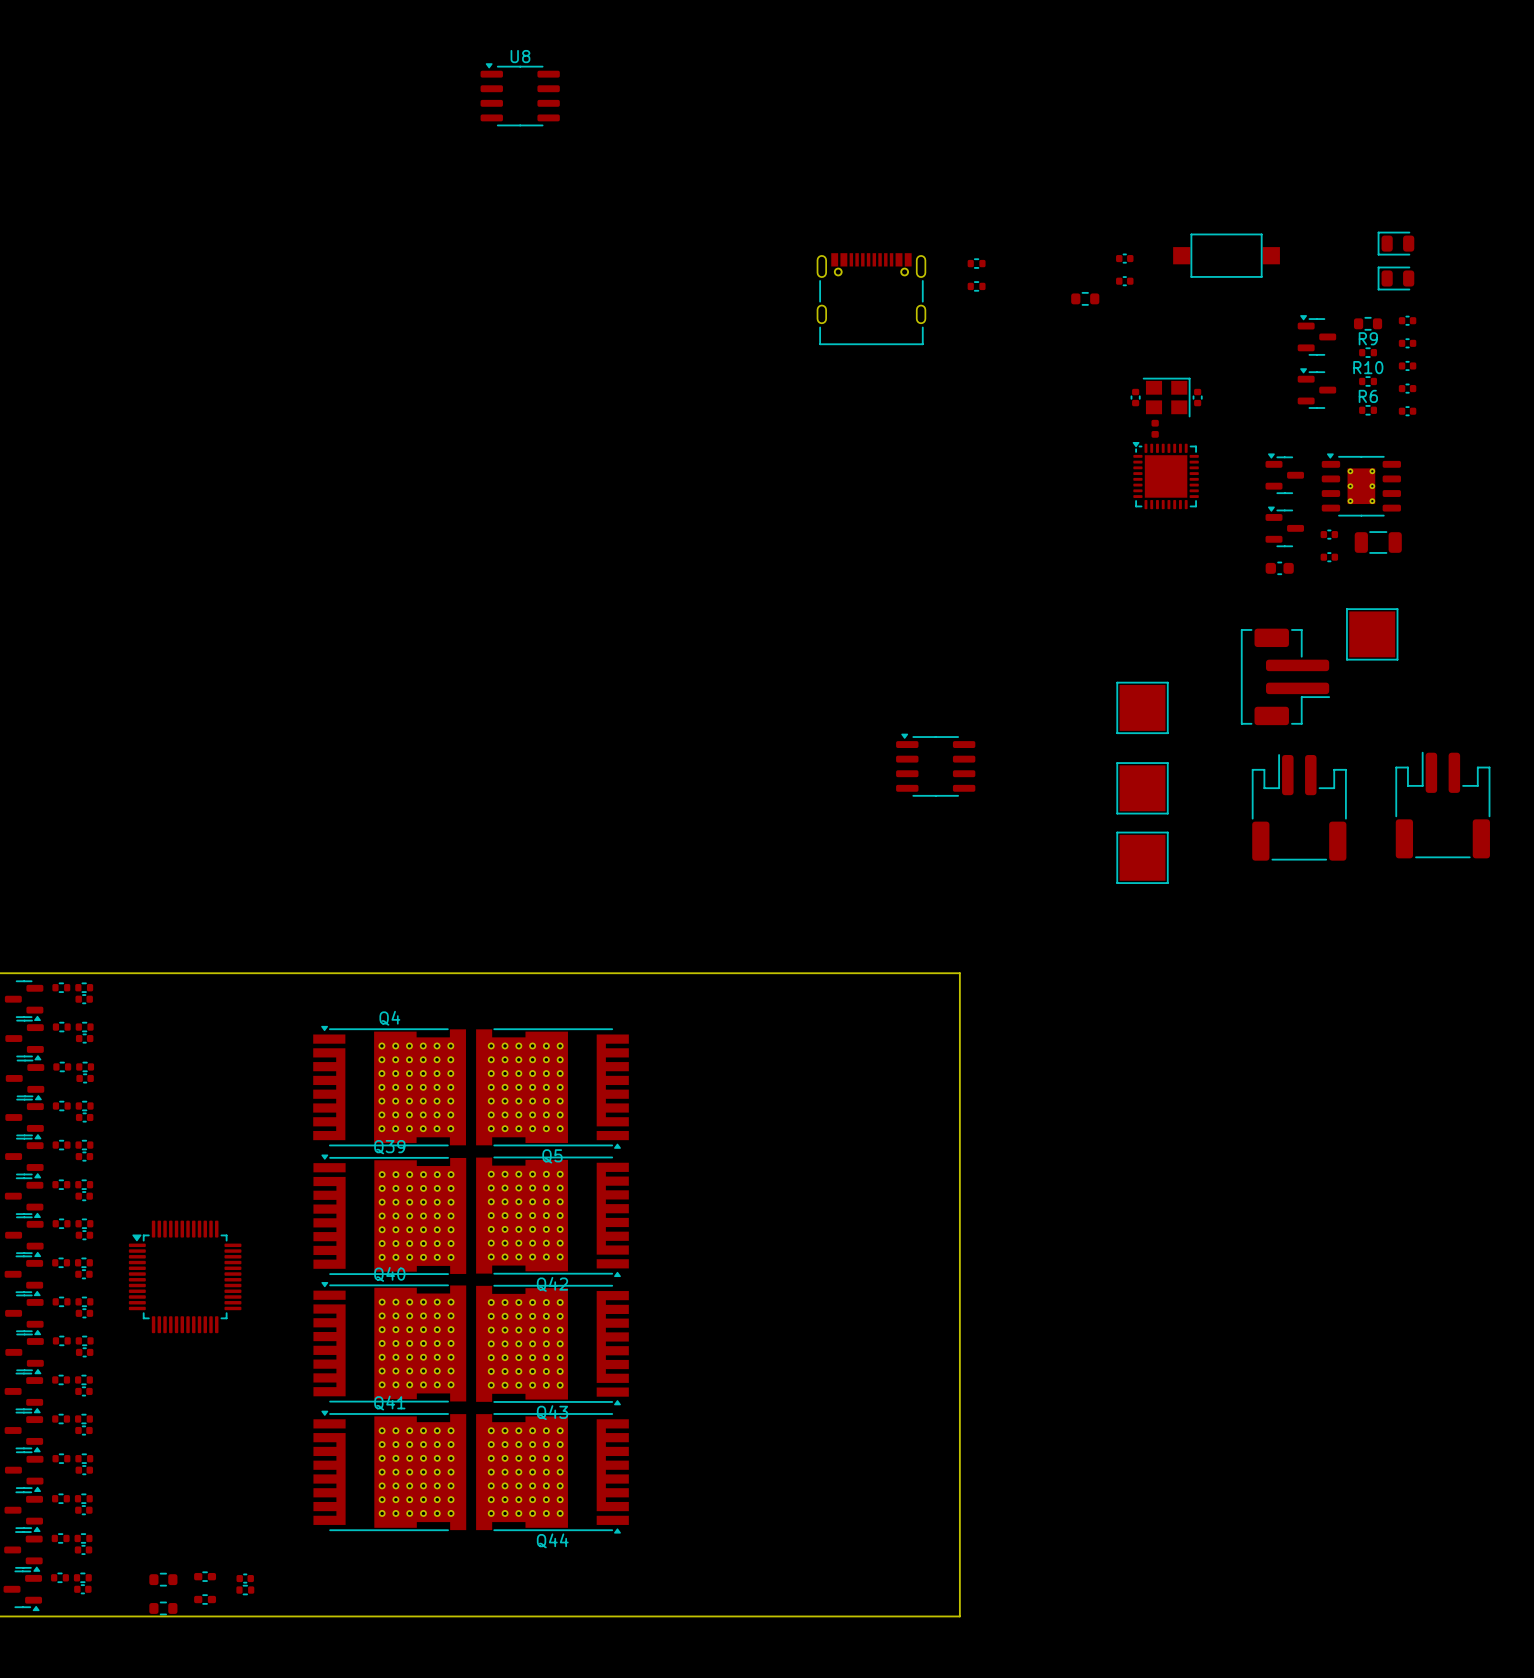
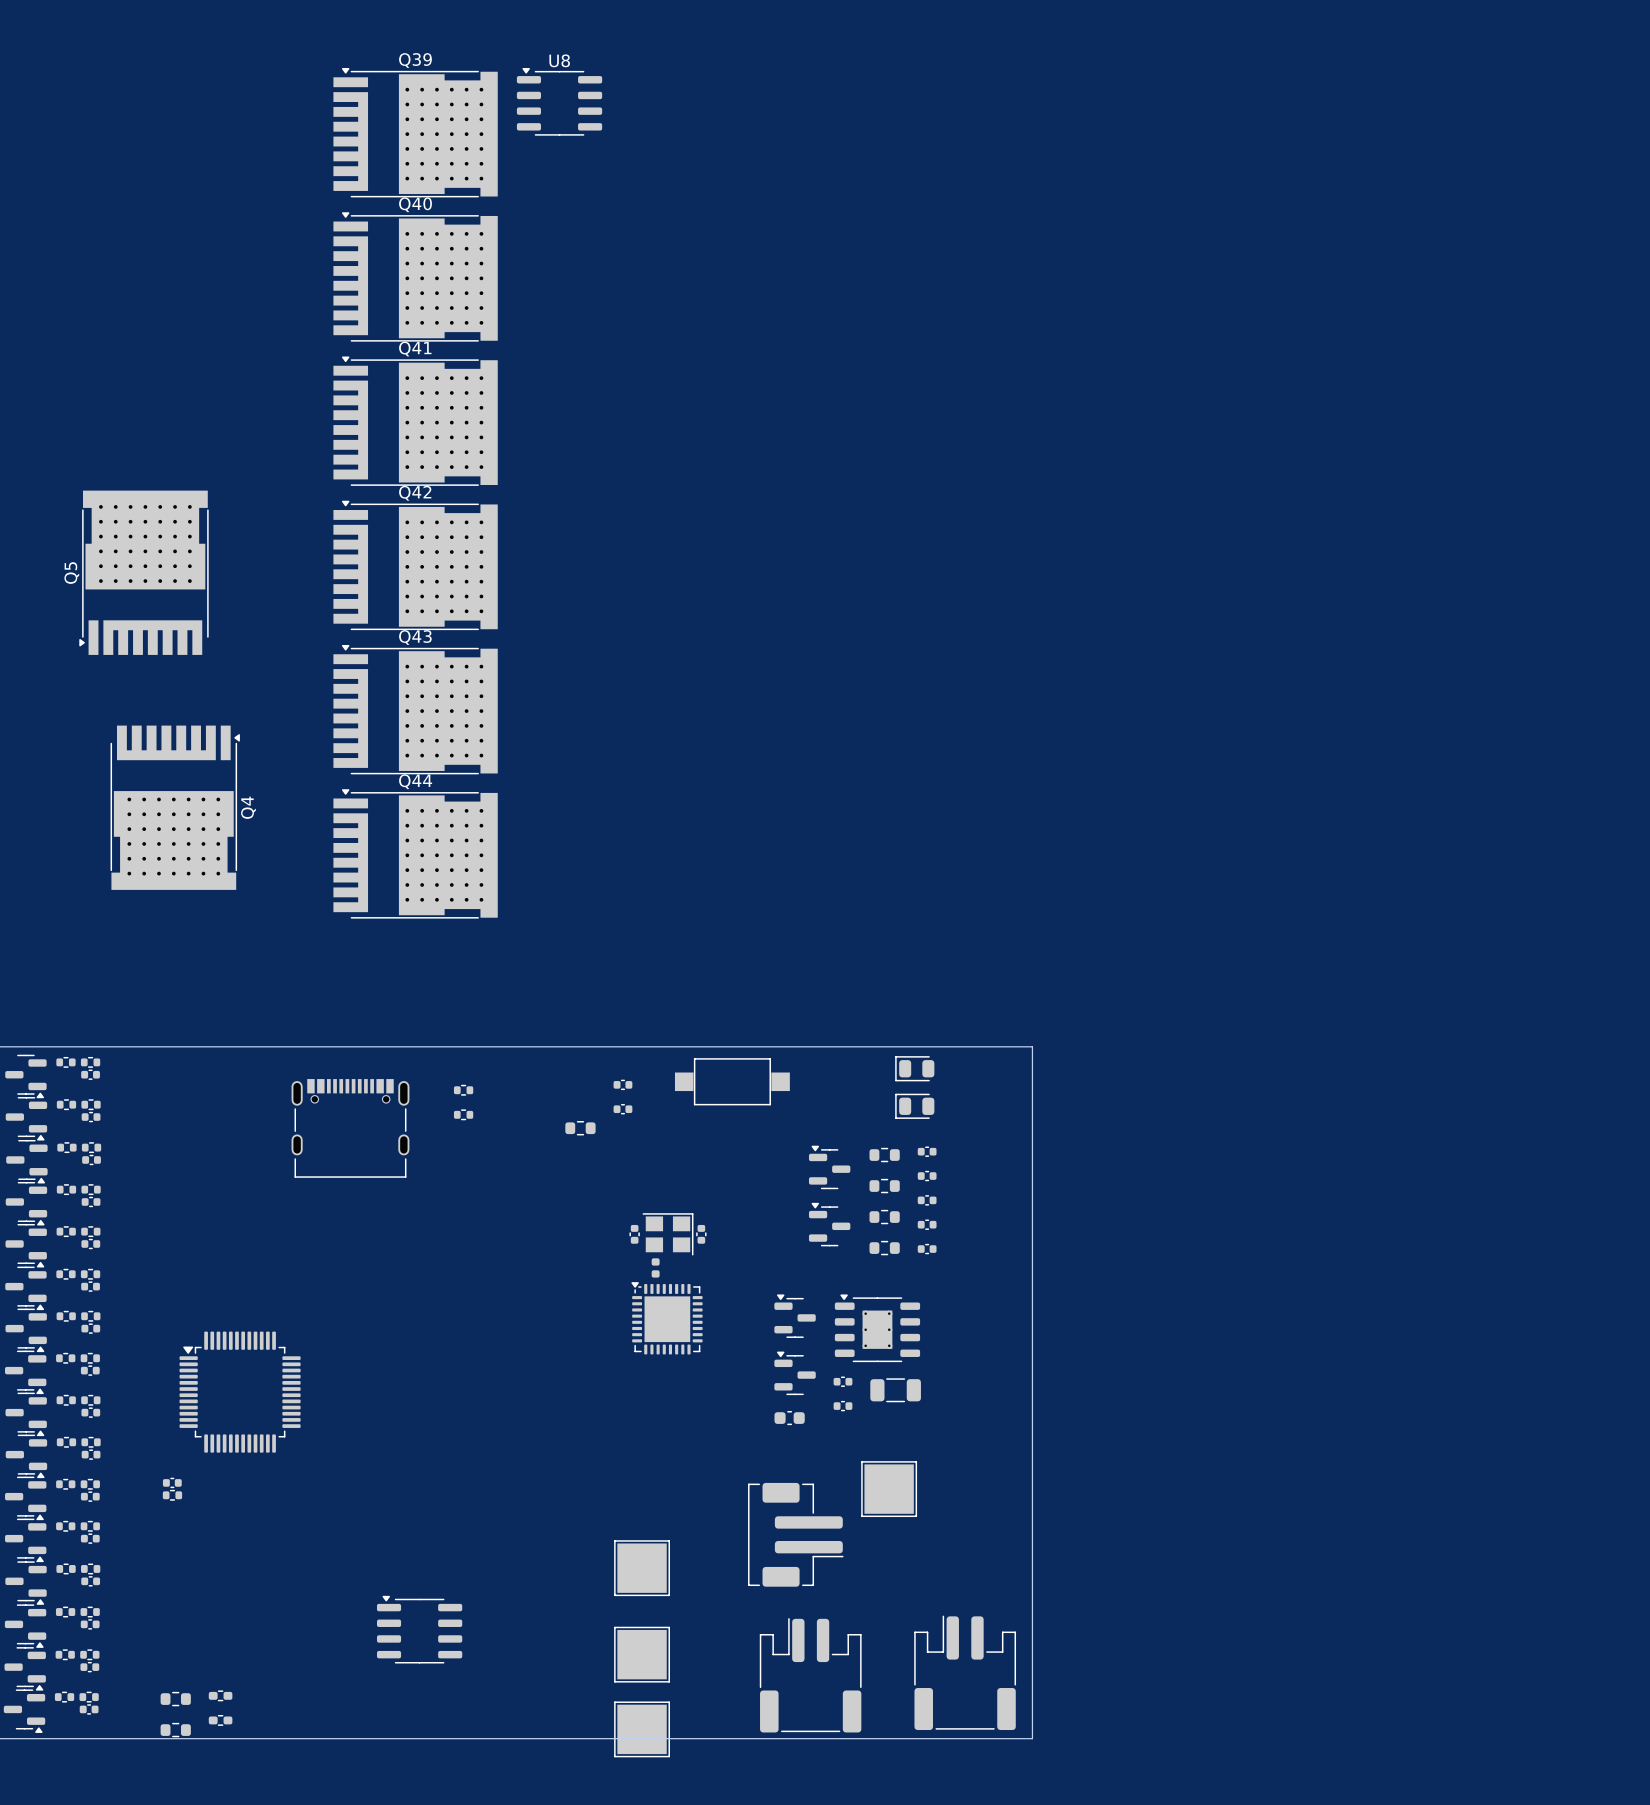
part: (1396, 243) -> none
part: (1226, 255) -> none
part: (1124, 258) -> none
part: (976, 263) -> none
part: (1396, 278) -> none
part: (1124, 281) -> none
part: (976, 286) -> none
part: (1085, 298) -> none
part: (871, 299) -> none
part: (1407, 320) -> none
part: (1368, 323) -> none
part: (1316, 335) -> none
part: (1407, 343) -> none
R9: (1368, 352) -> none
part: (1407, 365) -> none
R10: (1368, 381) -> none
part: (1316, 388) -> none
part: (1407, 388) -> none
part: (1135, 397) -> none
part: (1166, 397) -> none
part: (1197, 397) -> none
R6: (1368, 410) -> none
part: (1407, 411) -> none
part: (1155, 428) -> none
part: (1284, 473) -> none
part: (1165, 475) -> none
part: (1361, 484) -> none
part: (1284, 526) -> none
part: (1329, 534) -> none
part: (1378, 542) -> none
part: (1329, 557) -> none
part: (1279, 568) -> none
part: (1372, 634) -> none
part: (1285, 676) -> none
part: (1142, 707) -> none
part: (935, 765) -> none
part: (1142, 788) -> none
part: (1442, 805) -> none
part: (1299, 807) -> none
part: (1142, 857) -> none
part: none -> (914, 1068)
part: none -> (732, 1081)
part: none -> (622, 1084)
part: none -> (463, 1090)
part: none -> (914, 1106)
part: none -> (622, 1109)
part: none -> (463, 1114)
part: none -> (580, 1128)
part: none -> (350, 1128)
part: none -> (927, 1151)
part: none -> (884, 1155)
part: none -> (829, 1167)
Q4 rotation: 0° (389, 1086) -> 90° clockwise (175, 807)
Q4 position: (389, 1086) -> (175, 807)
Q5 rotation: 0° (552, 1088) -> 90° clockwise (143, 572)
Q5 position: (552, 1088) -> (143, 572)
part: none -> (927, 1176)
part: none -> (884, 1186)
part: none -> (927, 1200)
part: none -> (884, 1217)
part: none -> (829, 1224)
part: none -> (927, 1224)
part: none -> (634, 1234)
part: none -> (667, 1234)
part: none -> (701, 1234)
part: none -> (884, 1248)
part: none -> (927, 1249)
part: none -> (655, 1267)
Q39 position: (389, 1214) -> (415, 132)
Q42 rotation: 0° (552, 1216) -> 180° (415, 565)
Q42 position: (552, 1216) -> (415, 565)
part: none -> (795, 1316)
part: none -> (667, 1318)
part: none -> (877, 1328)
part position: (185, 1276) -> (240, 1392)
part: none -> (795, 1373)
part: none -> (842, 1381)
part: none -> (895, 1390)
part: none -> (842, 1406)
part: none -> (789, 1418)
Q40 position: (389, 1342) -> (415, 276)
Q43 rotation: 0° (552, 1345) -> 180° (415, 709)
Q43 position: (552, 1345) -> (415, 709)
part: none -> (889, 1489)
part: none -> (795, 1534)
part: none -> (642, 1568)
Q41 position: (389, 1470) -> (415, 421)
Q44 rotation: 0° (552, 1473) -> 180° (415, 853)
Q44 position: (552, 1473) -> (415, 853)
part: none -> (419, 1629)
part: none -> (642, 1654)
part: none -> (965, 1672)
part: none -> (810, 1675)
part position: (245, 1578) -> (172, 1482)
part position: (245, 1590) -> (172, 1495)
part: none -> (642, 1729)

